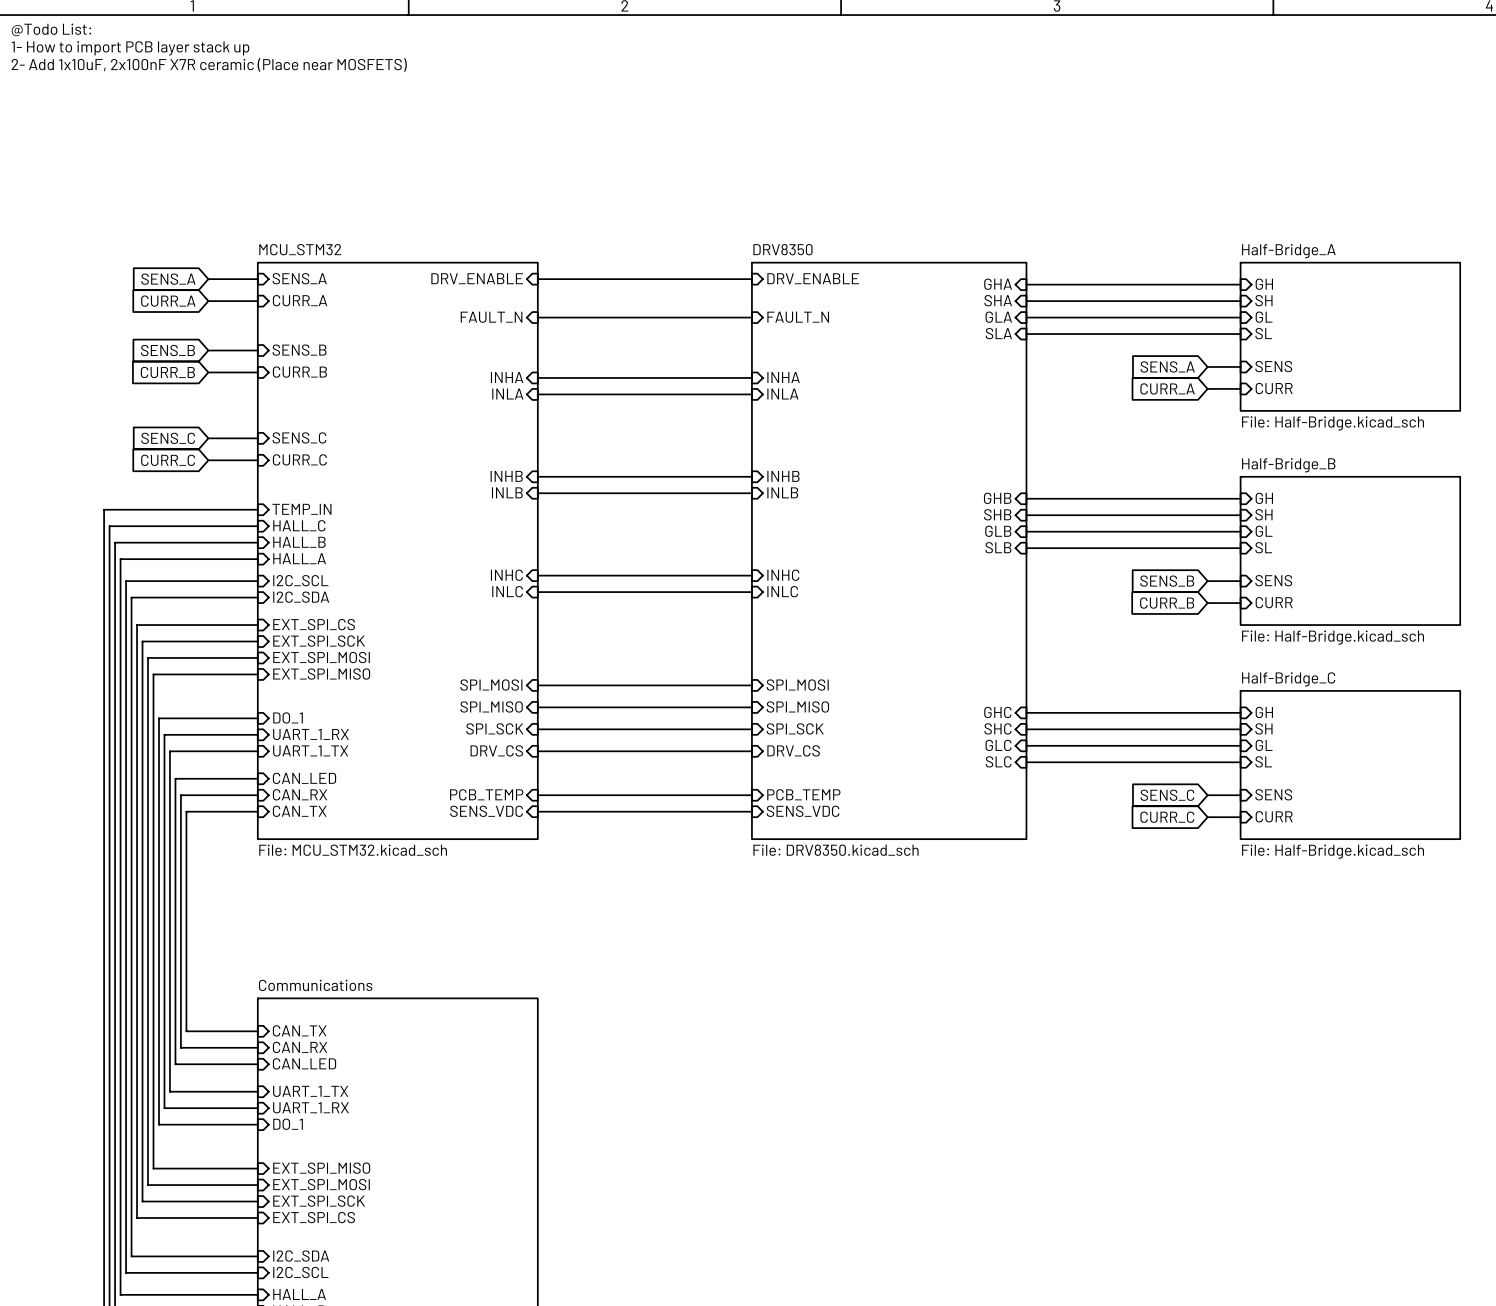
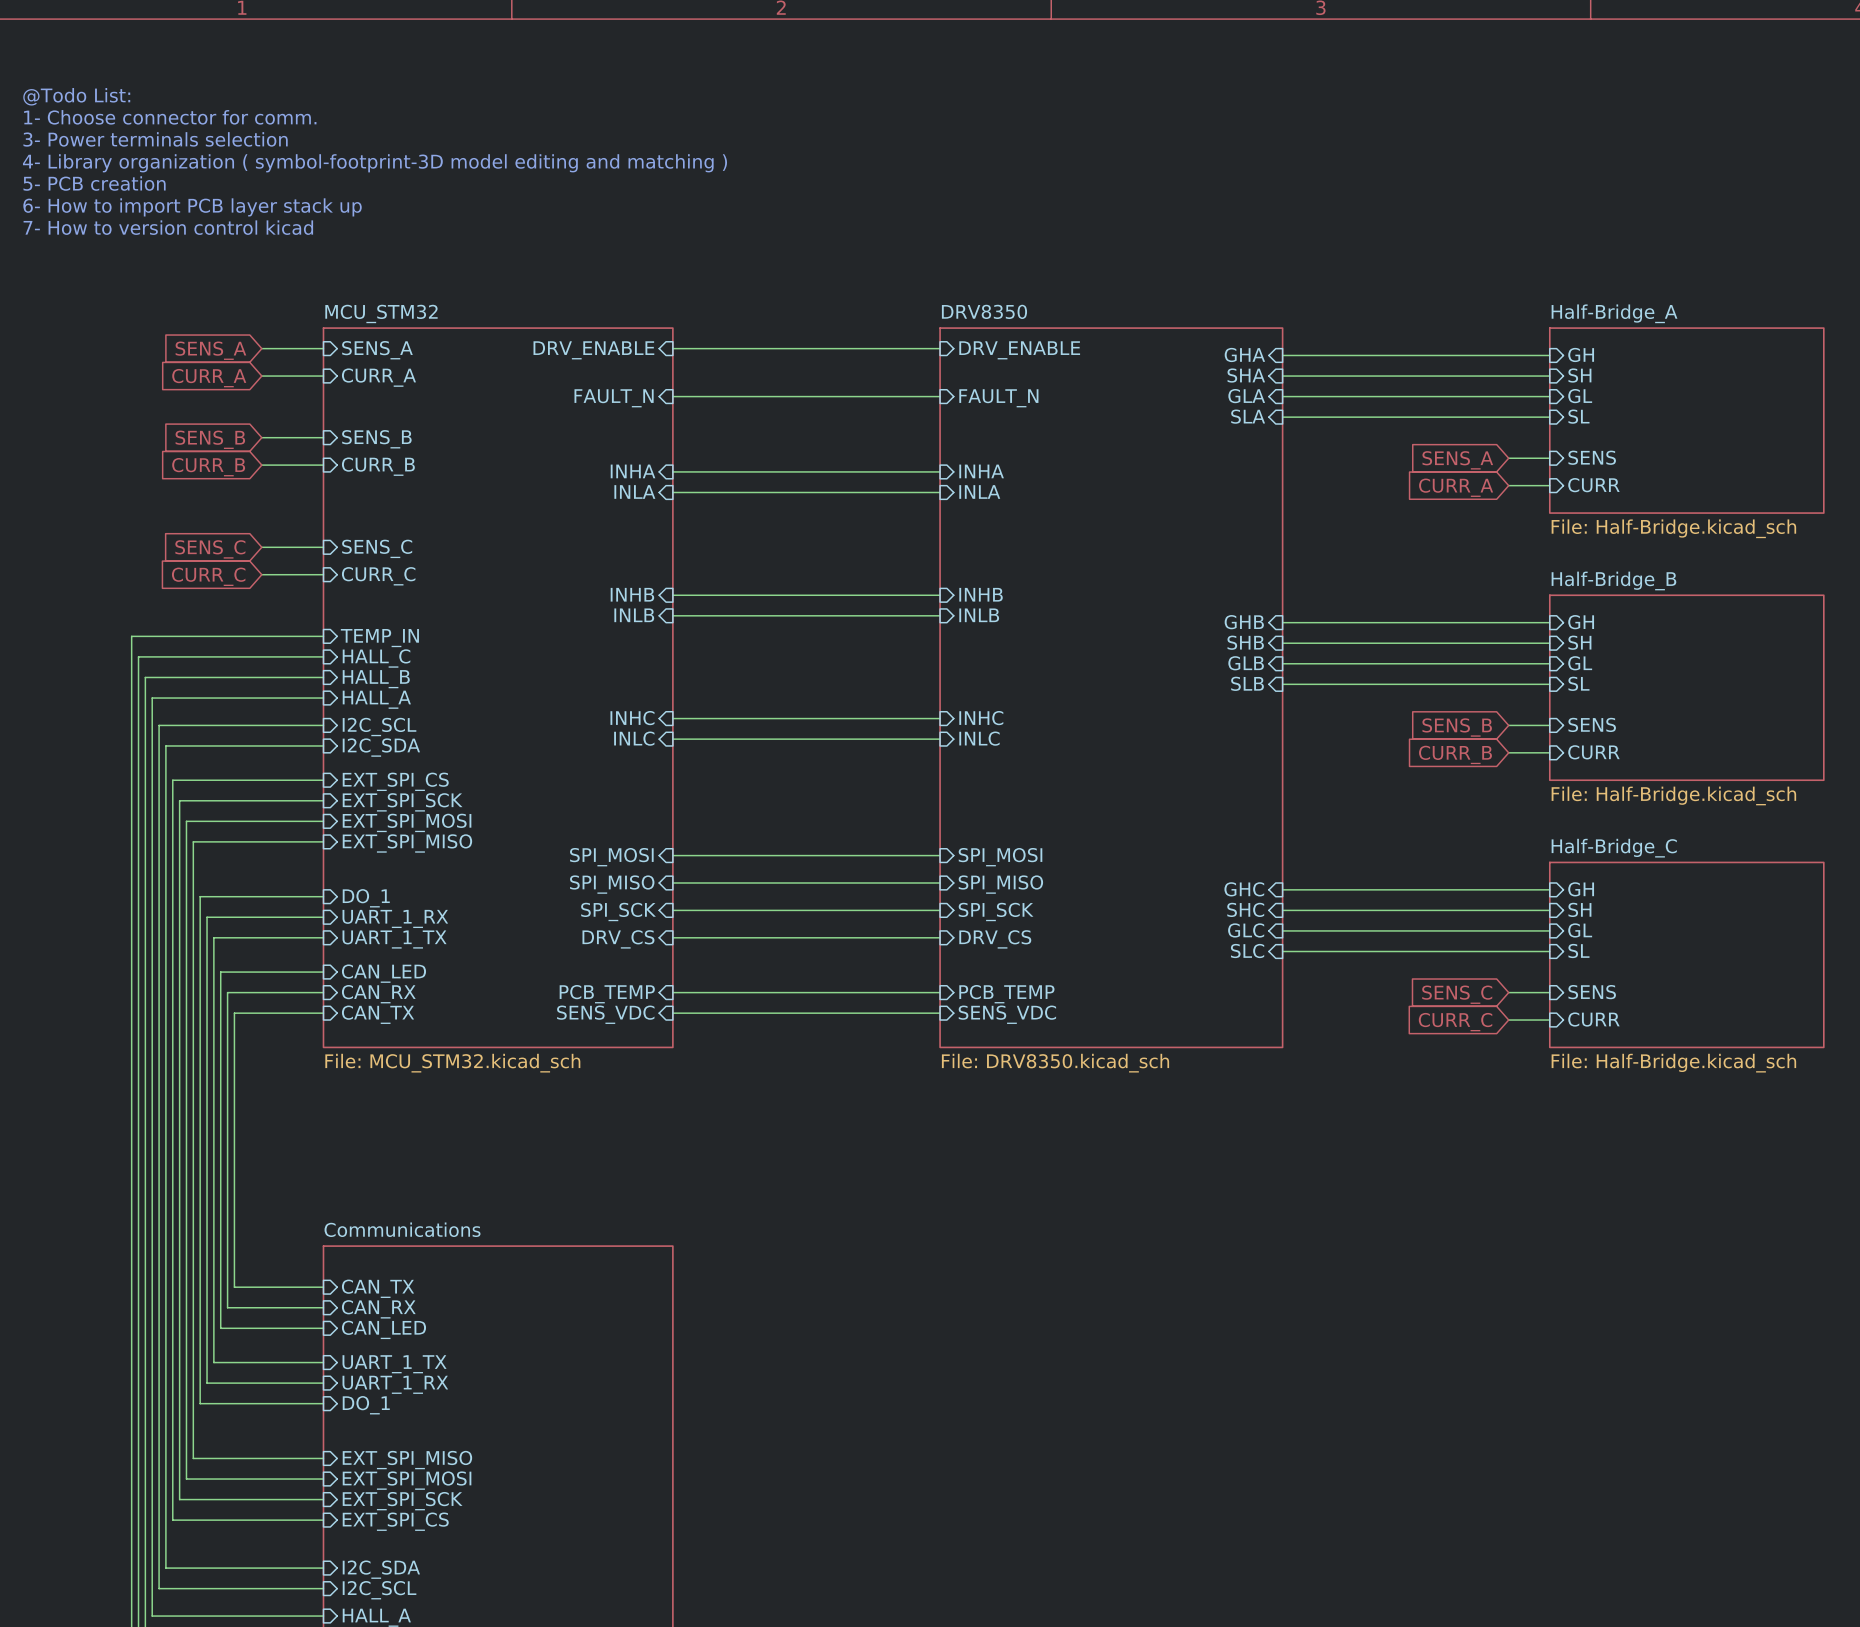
text position: @Todo List: (51, 29) -> @Todo List: (76, 96)
text: 1- How to import PCB layer stack up (130, 48) -> none
text: 2- Add 1x10uF, 2x100nF X7R ceramic (Place near MOSFETS) (209, 64) -> none
text: none -> 1- Choose connector for comm. (170, 117)
text: none -> 3- Power terminals selection (155, 139)
text: none -> 4- Library organization ( symbol-footprint-3D model editing and matching ) (374, 163)
text: none -> 5- PCB creation (94, 183)
text: none -> 6- How to import PCB layer stack up (192, 207)
text: none -> 7- How to version control kicad (168, 227)

